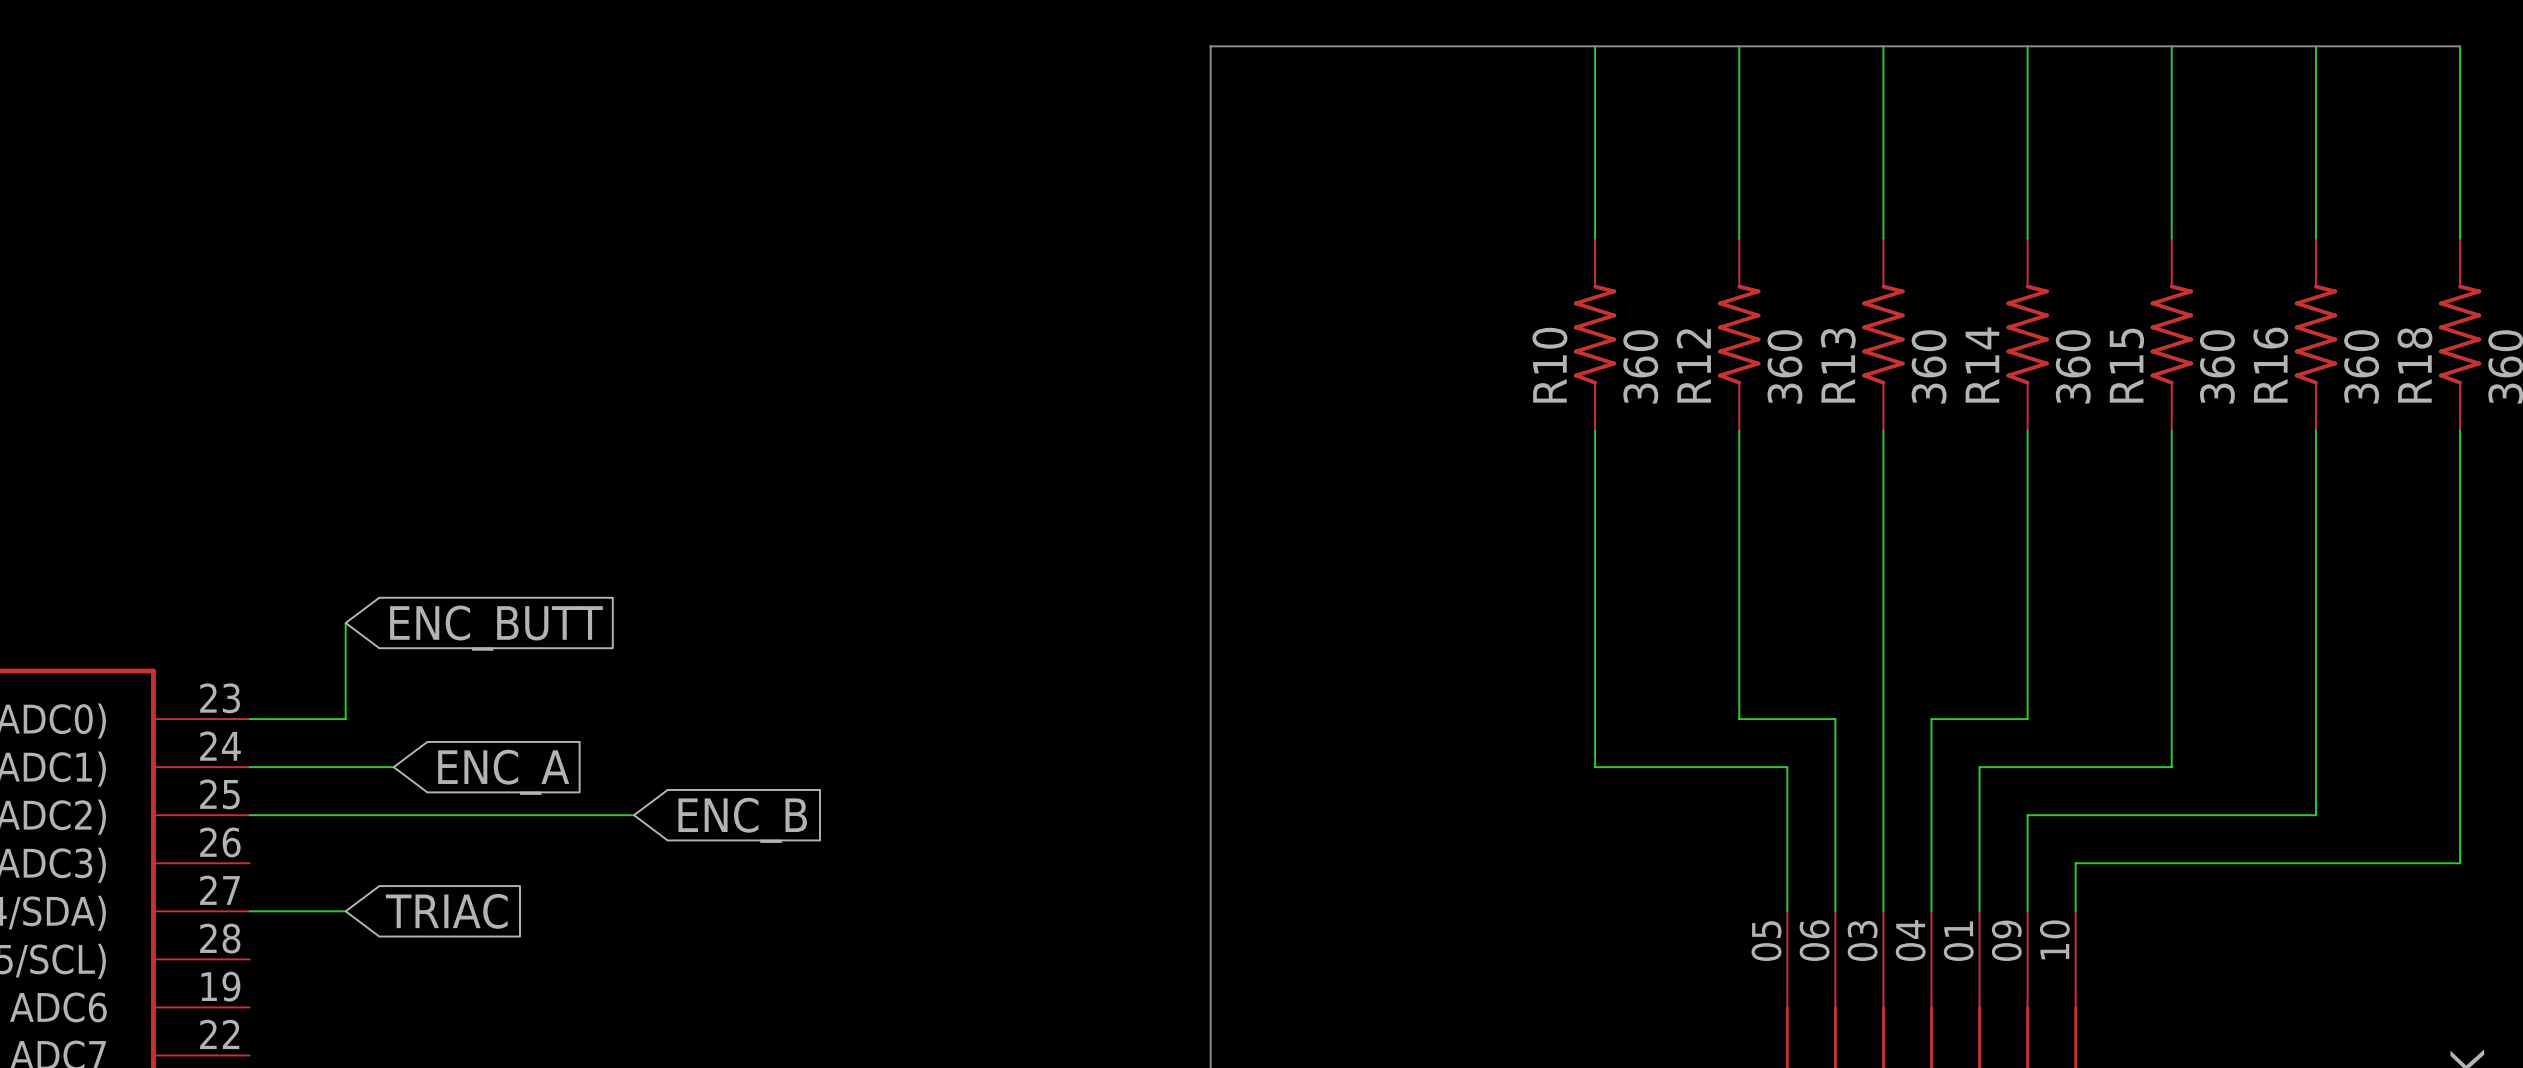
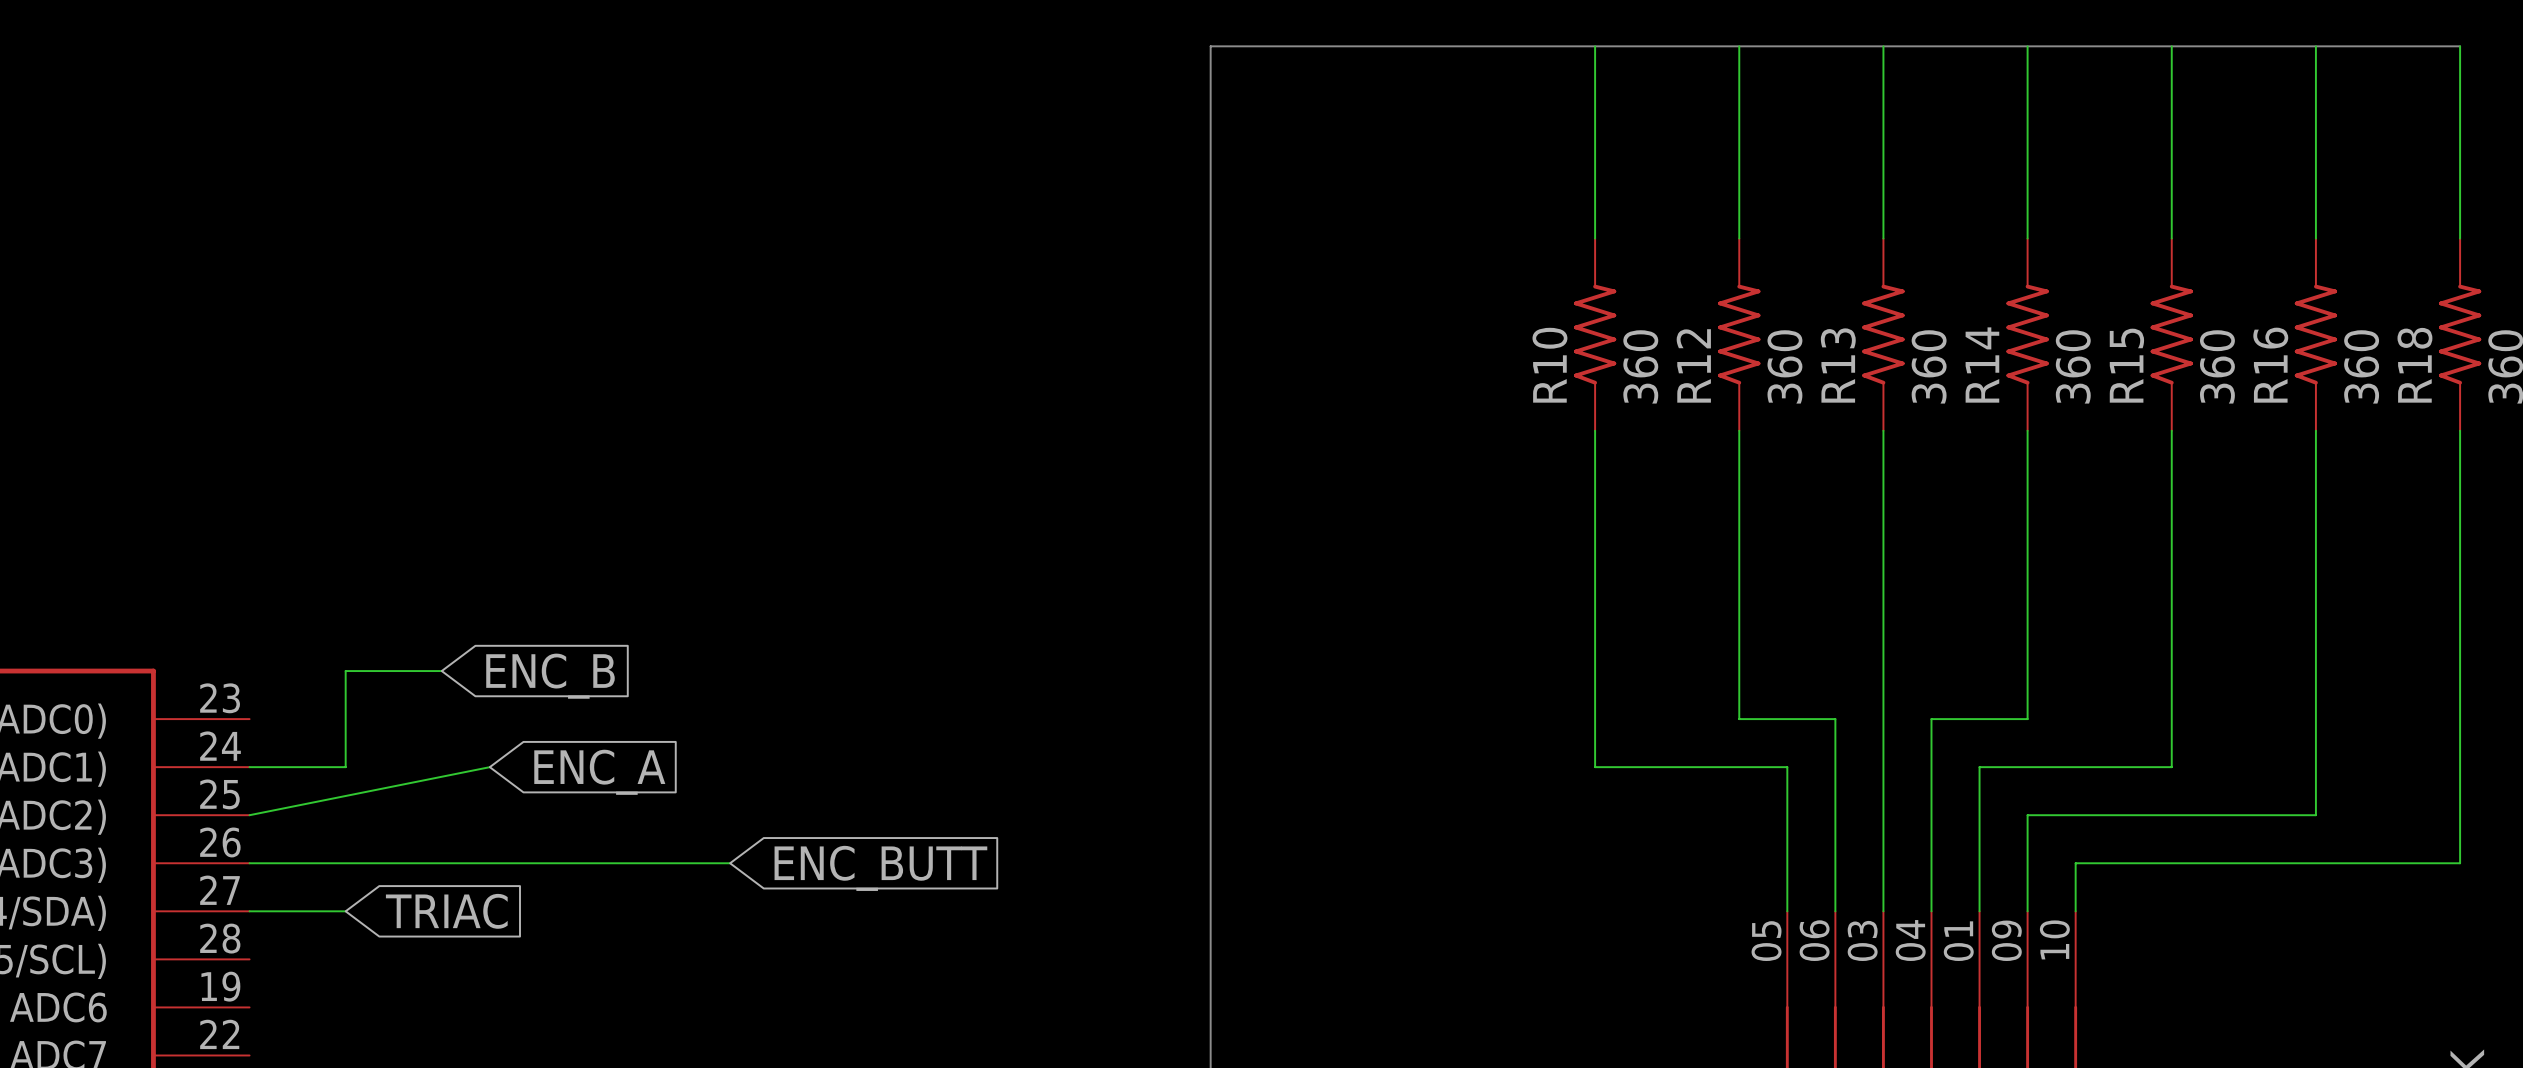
wire: (345, 622) (345, 671) -> (441, 671) (345, 671)
global label position: ENC_BUTT (496, 628) -> ENC_BUTT (880, 868)
wire: (249, 719) (345, 719) -> none
wire: (345, 767) (393, 767) -> (345, 767) (345, 719)
global label position: ENC_A (503, 772) -> ENC_A (599, 772)
wire: (249, 815) (634, 815) -> (249, 815) (489, 767)
global label position: ENC_B (742, 820) -> ENC_B (550, 676)
wire: none -> (249, 863) (730, 863)

